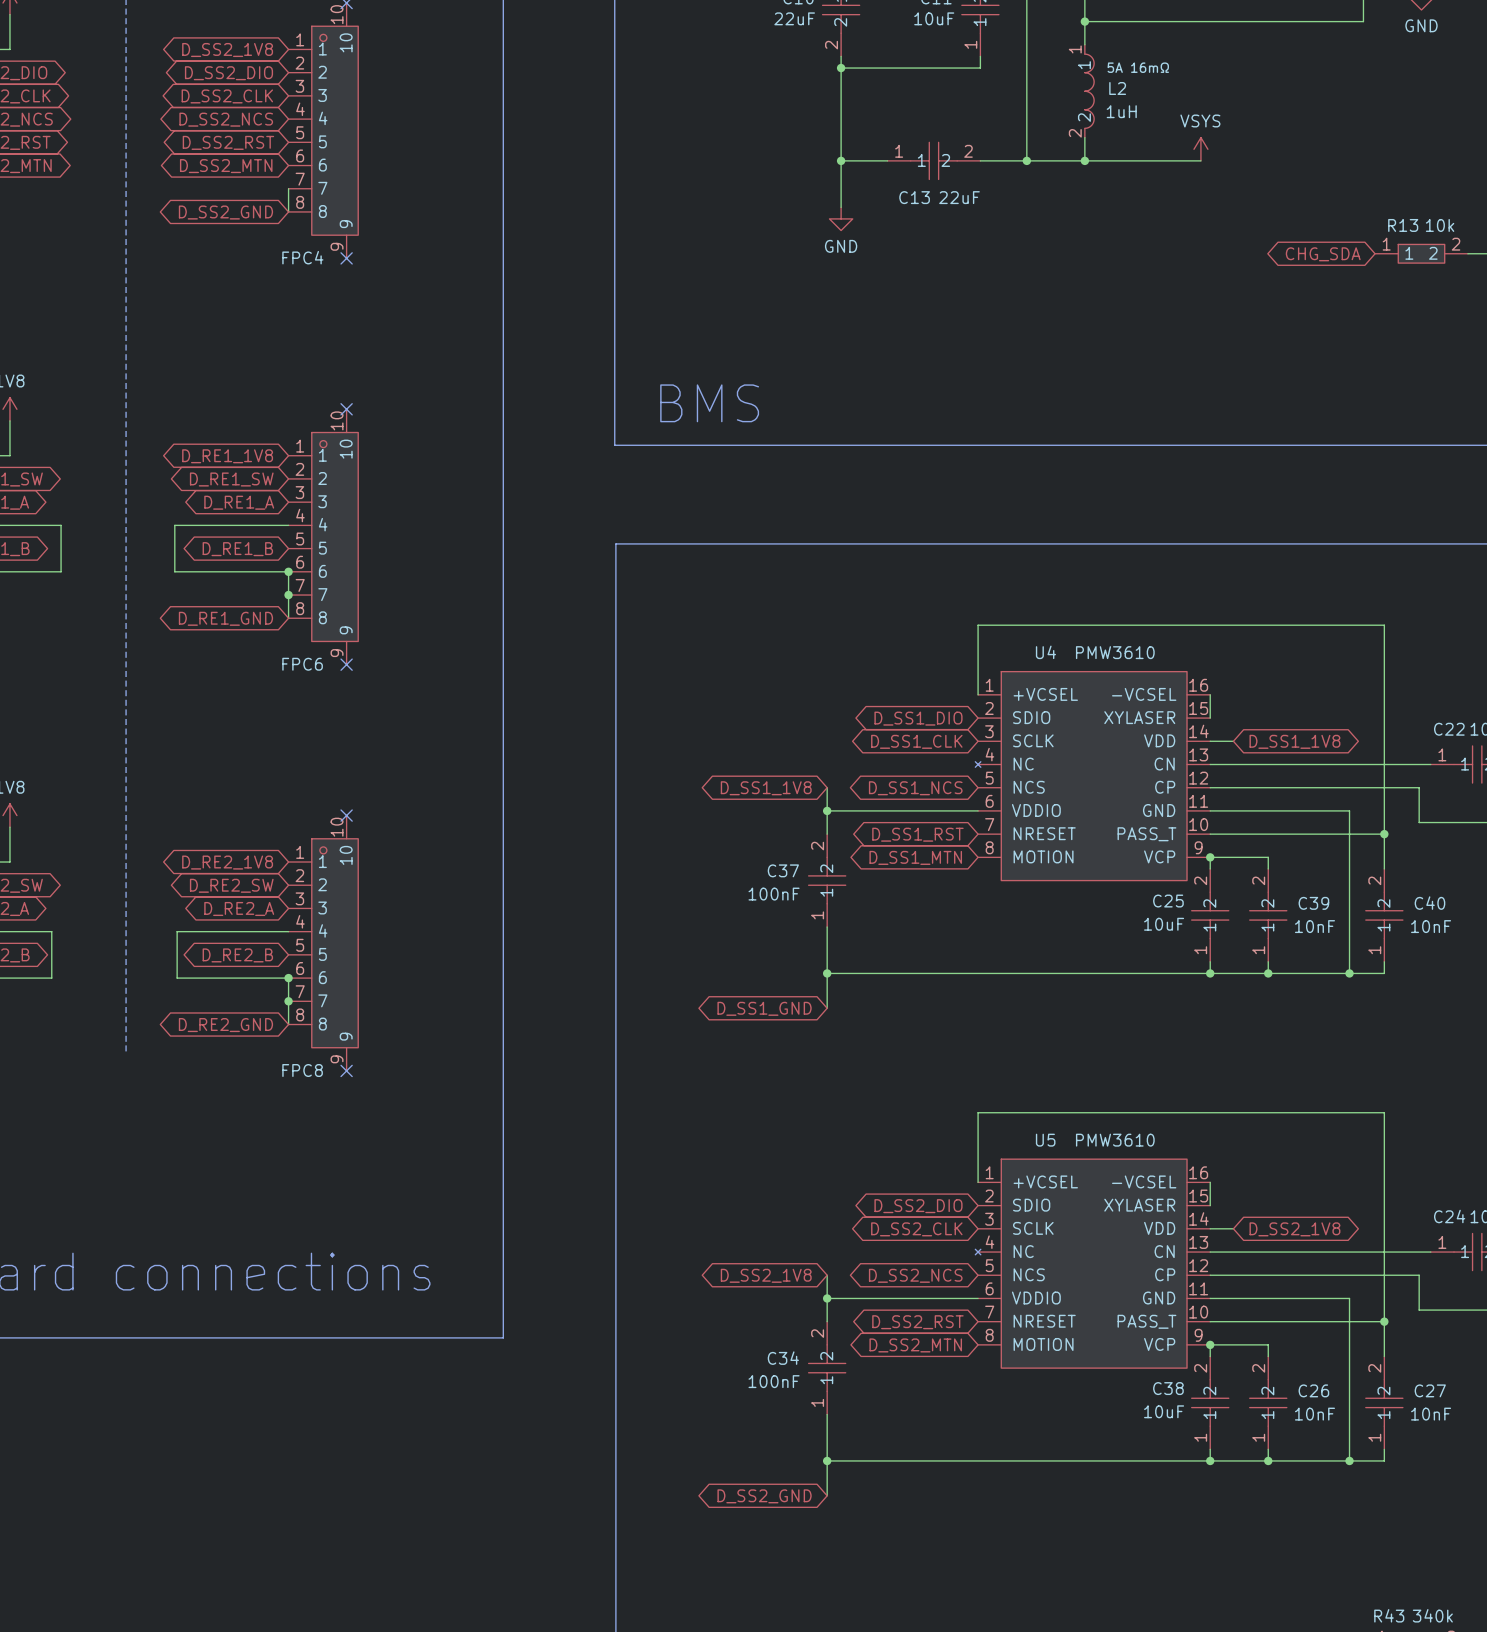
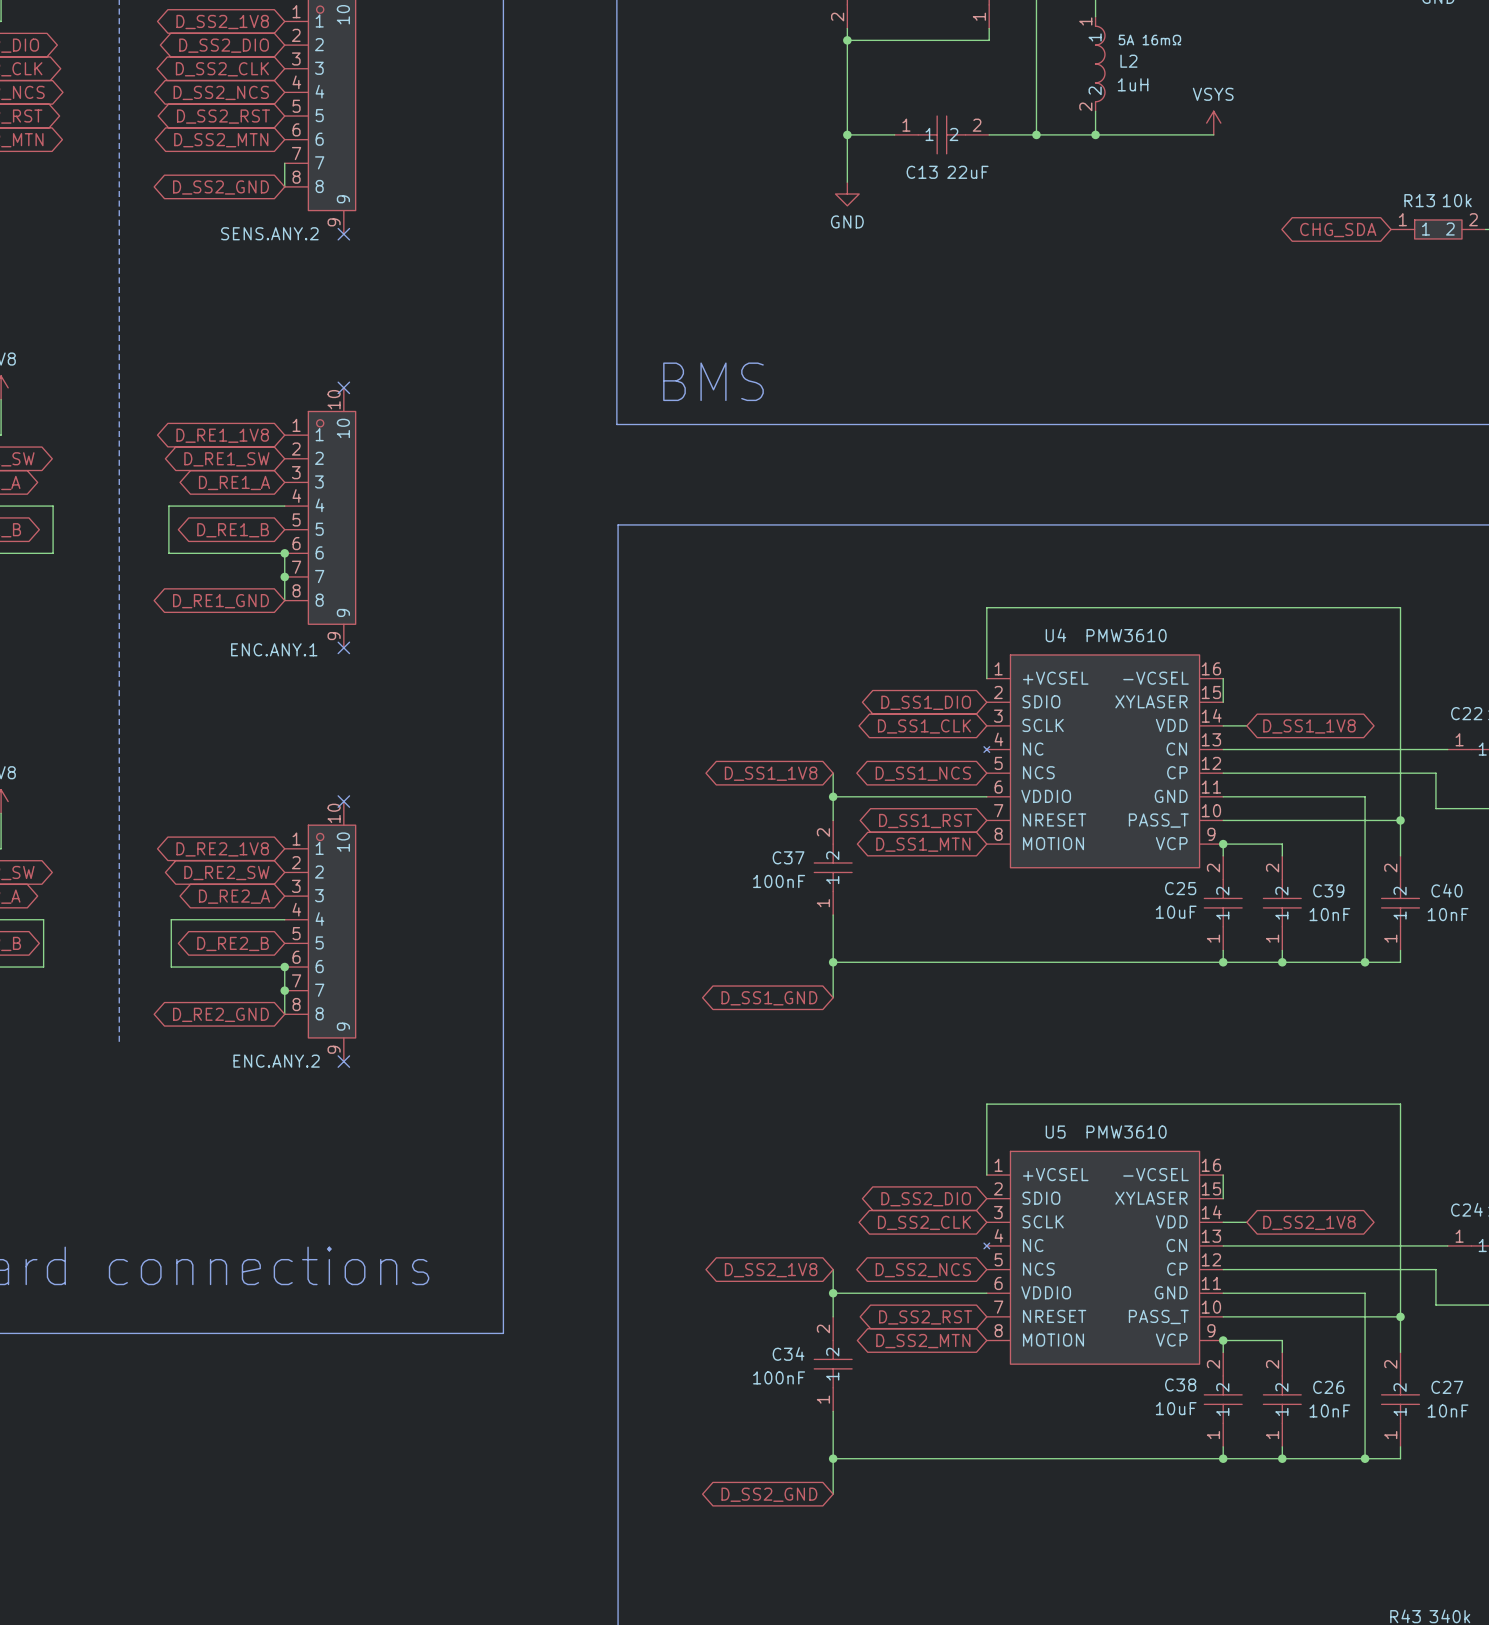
FPC4 name: FPC4 (302, 257) -> SENS.ANY.2 (269, 233)
FPC6 name: FPC6 (302, 664) -> ENC.ANY.1 (274, 649)
FPC8 name: FPC8 (302, 1070) -> ENC.ANY.2 (276, 1061)

